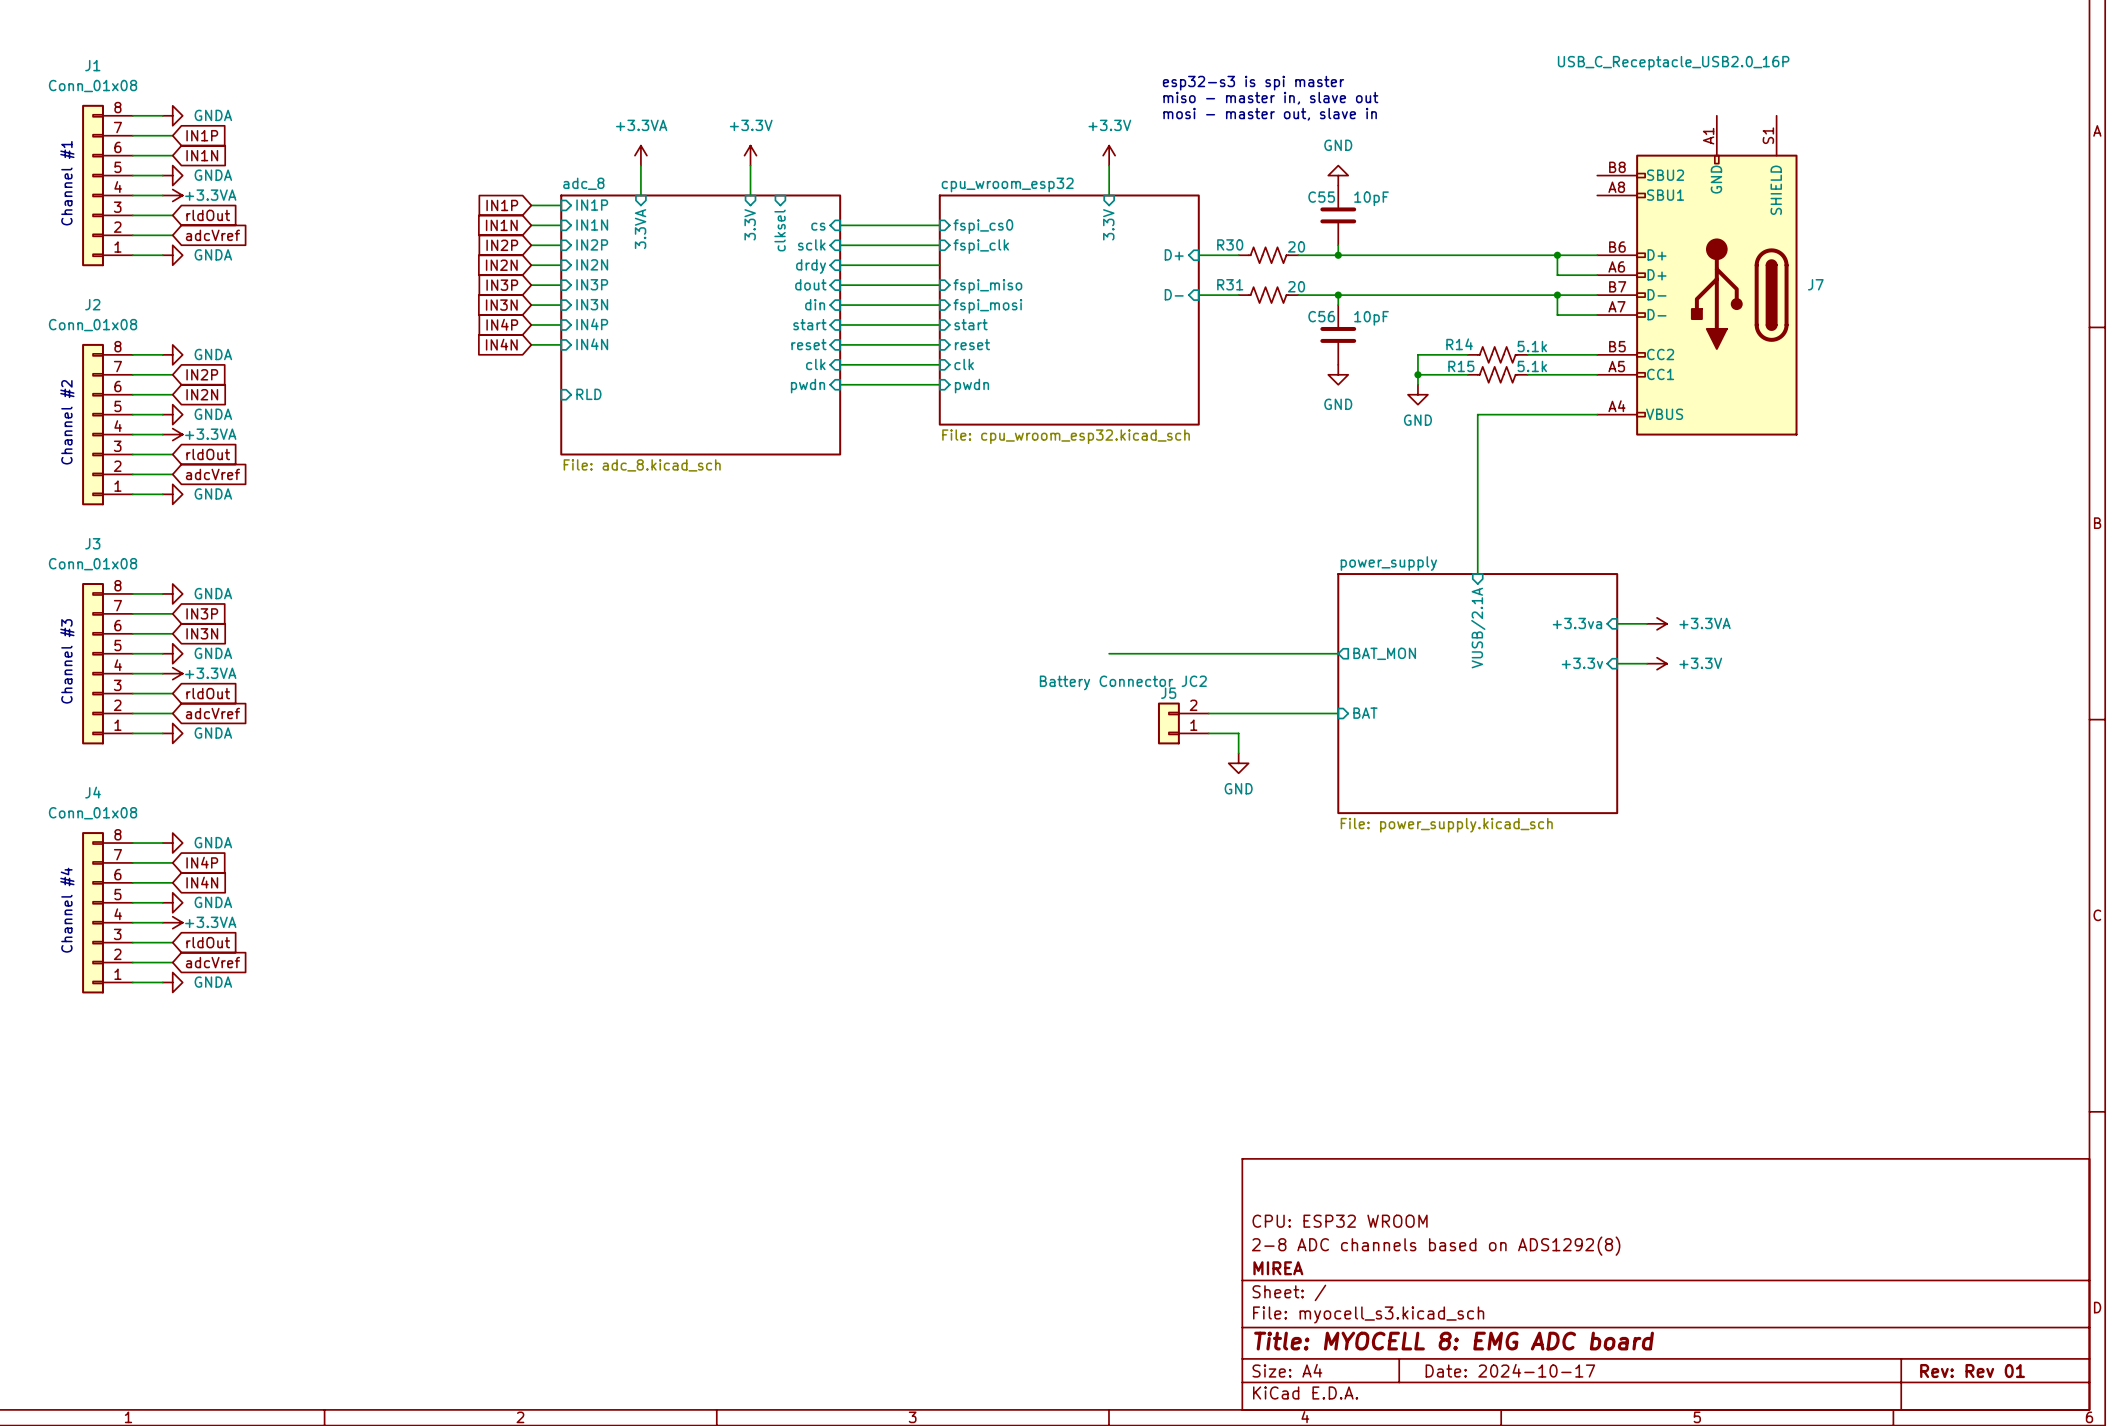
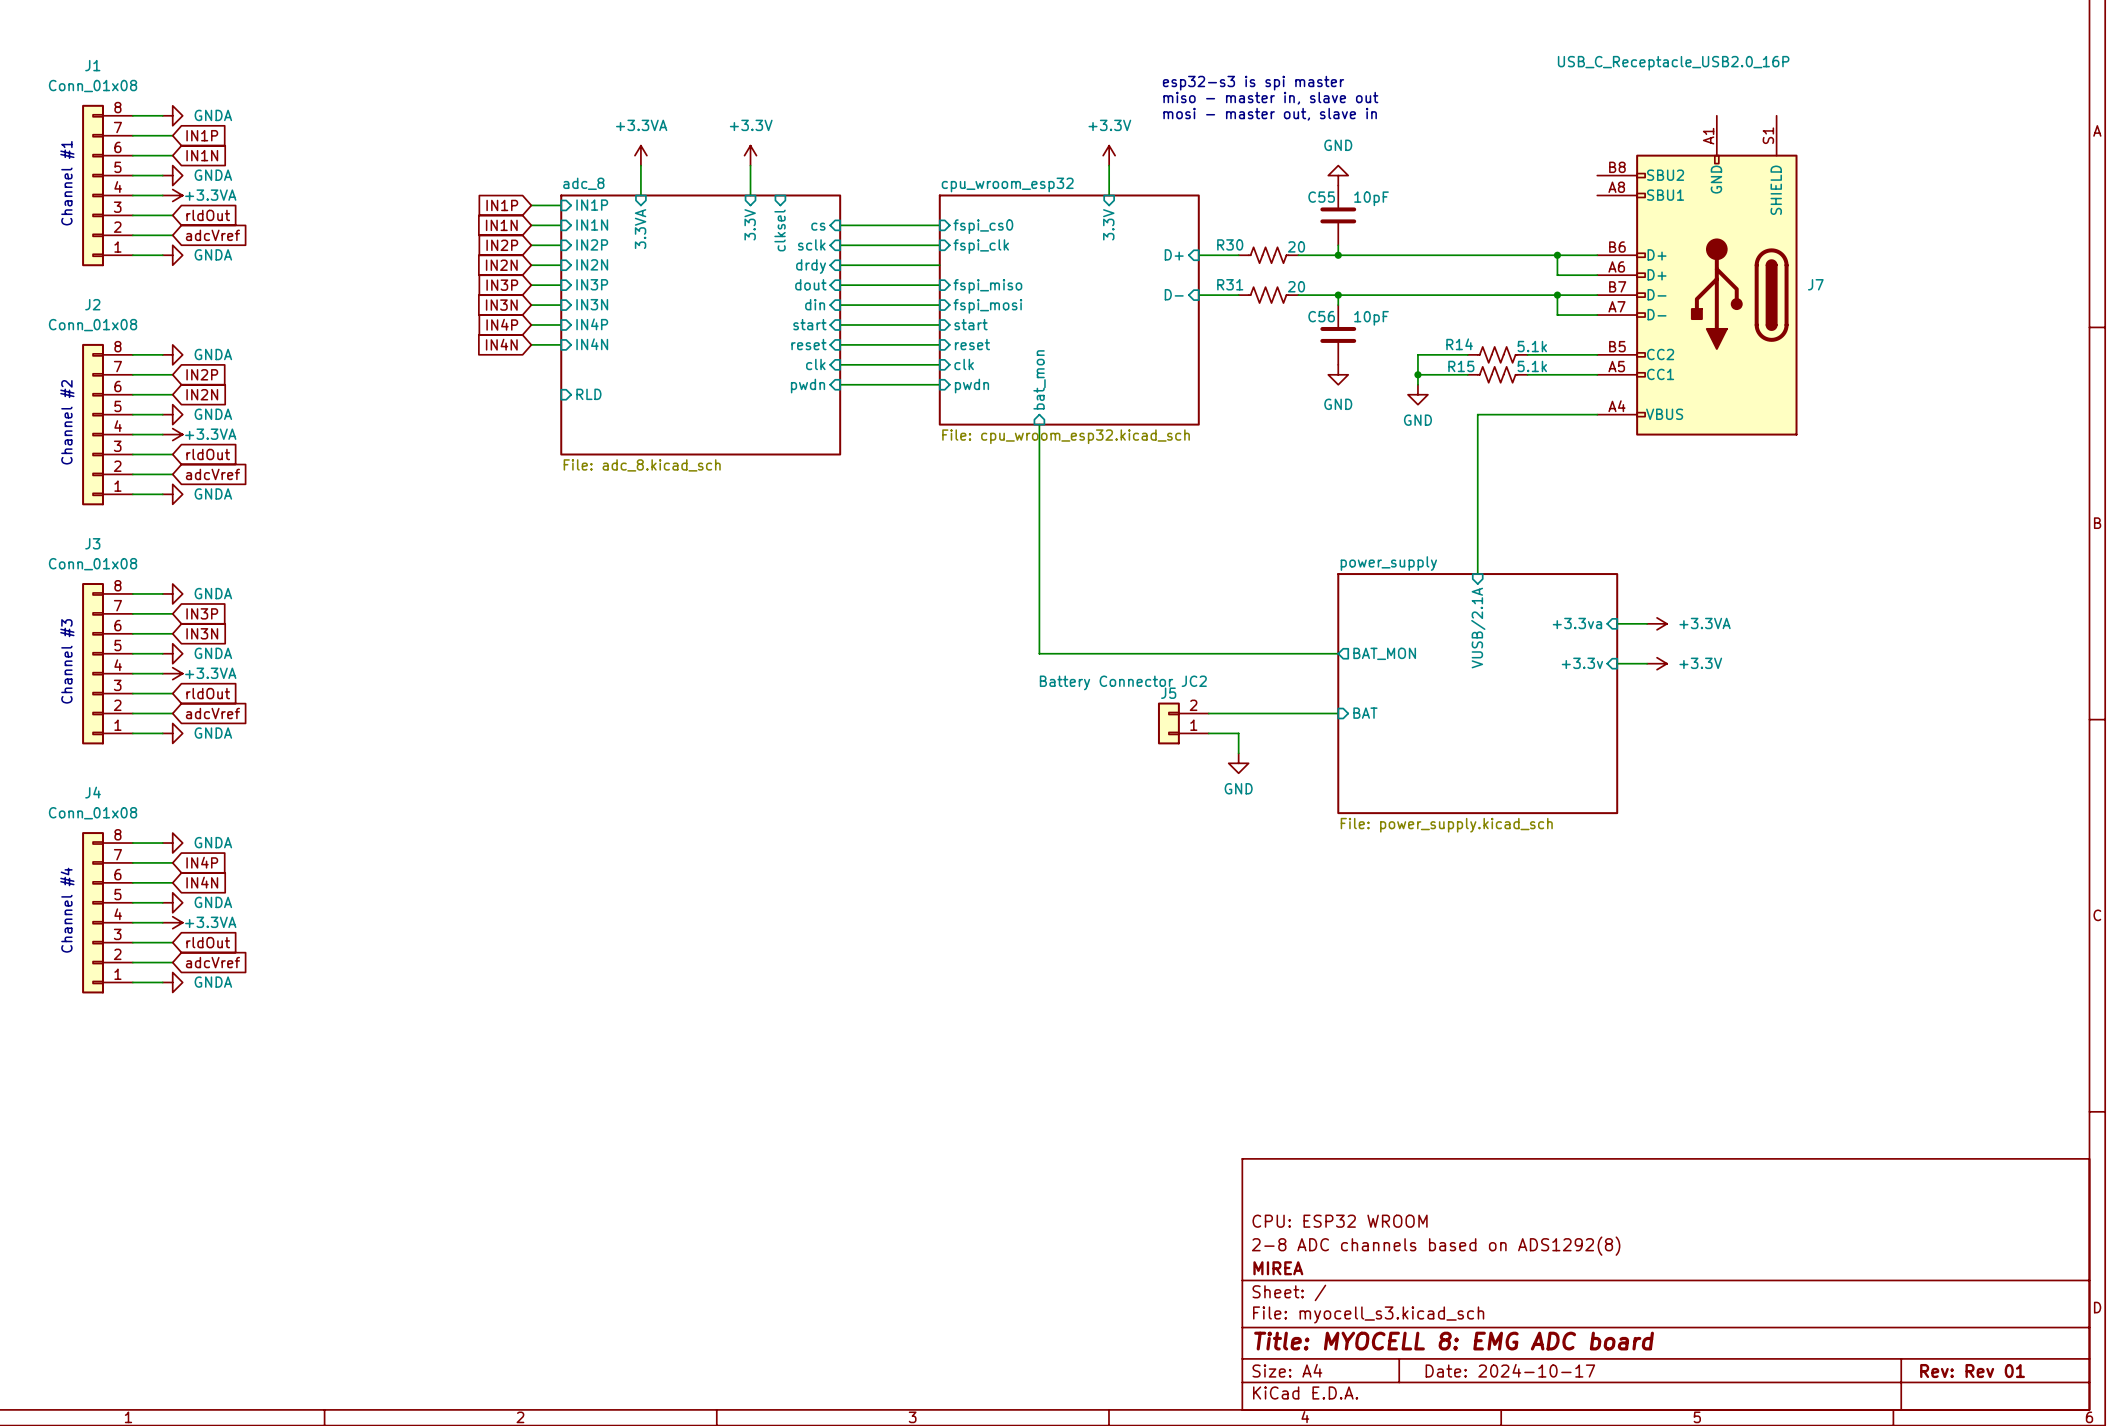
sheet pin: none -> bat_mon (1039, 379)
wire: none -> (1039, 424) (1039, 653) (1109, 653)

